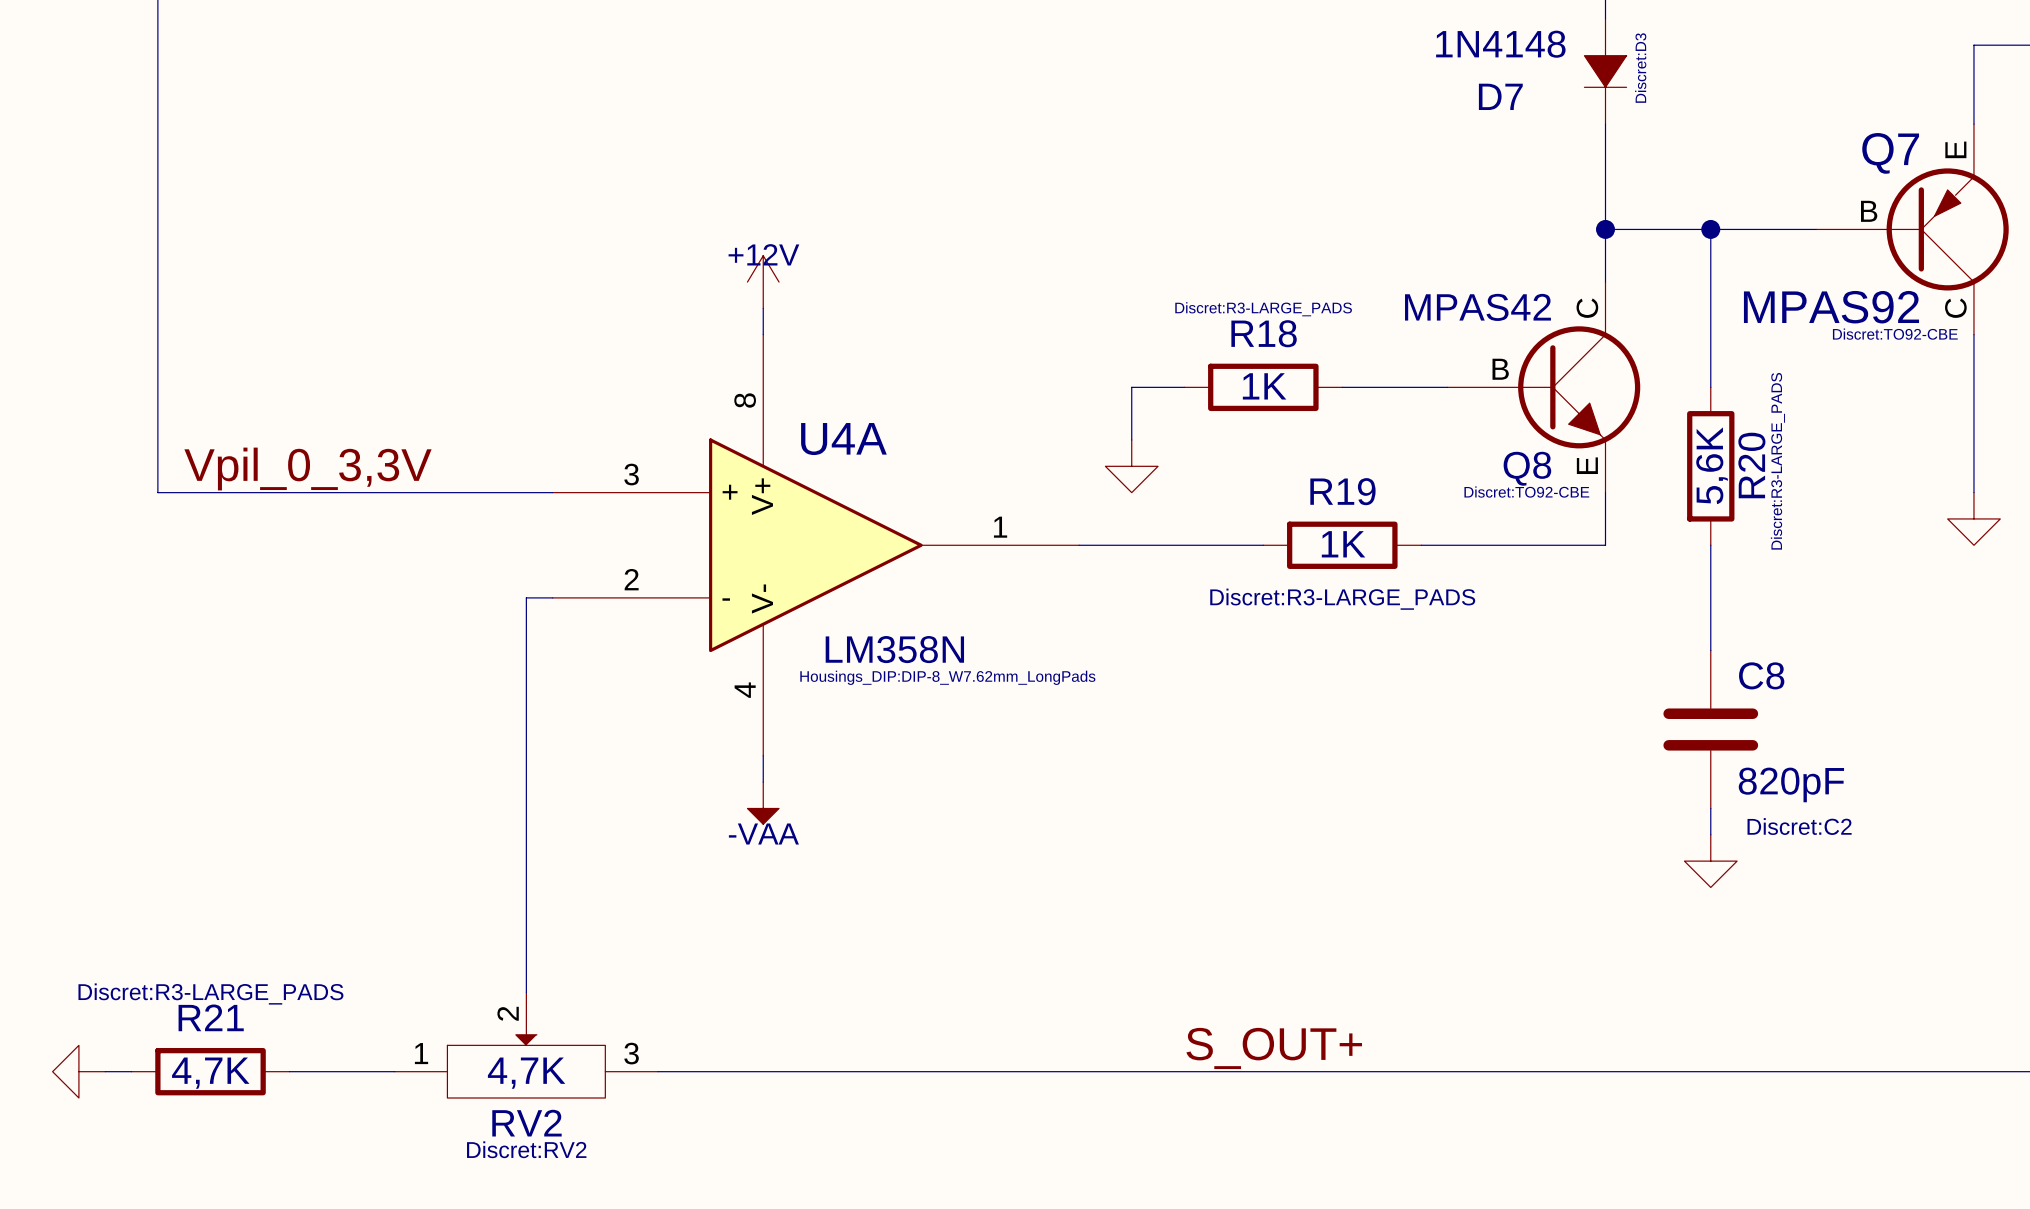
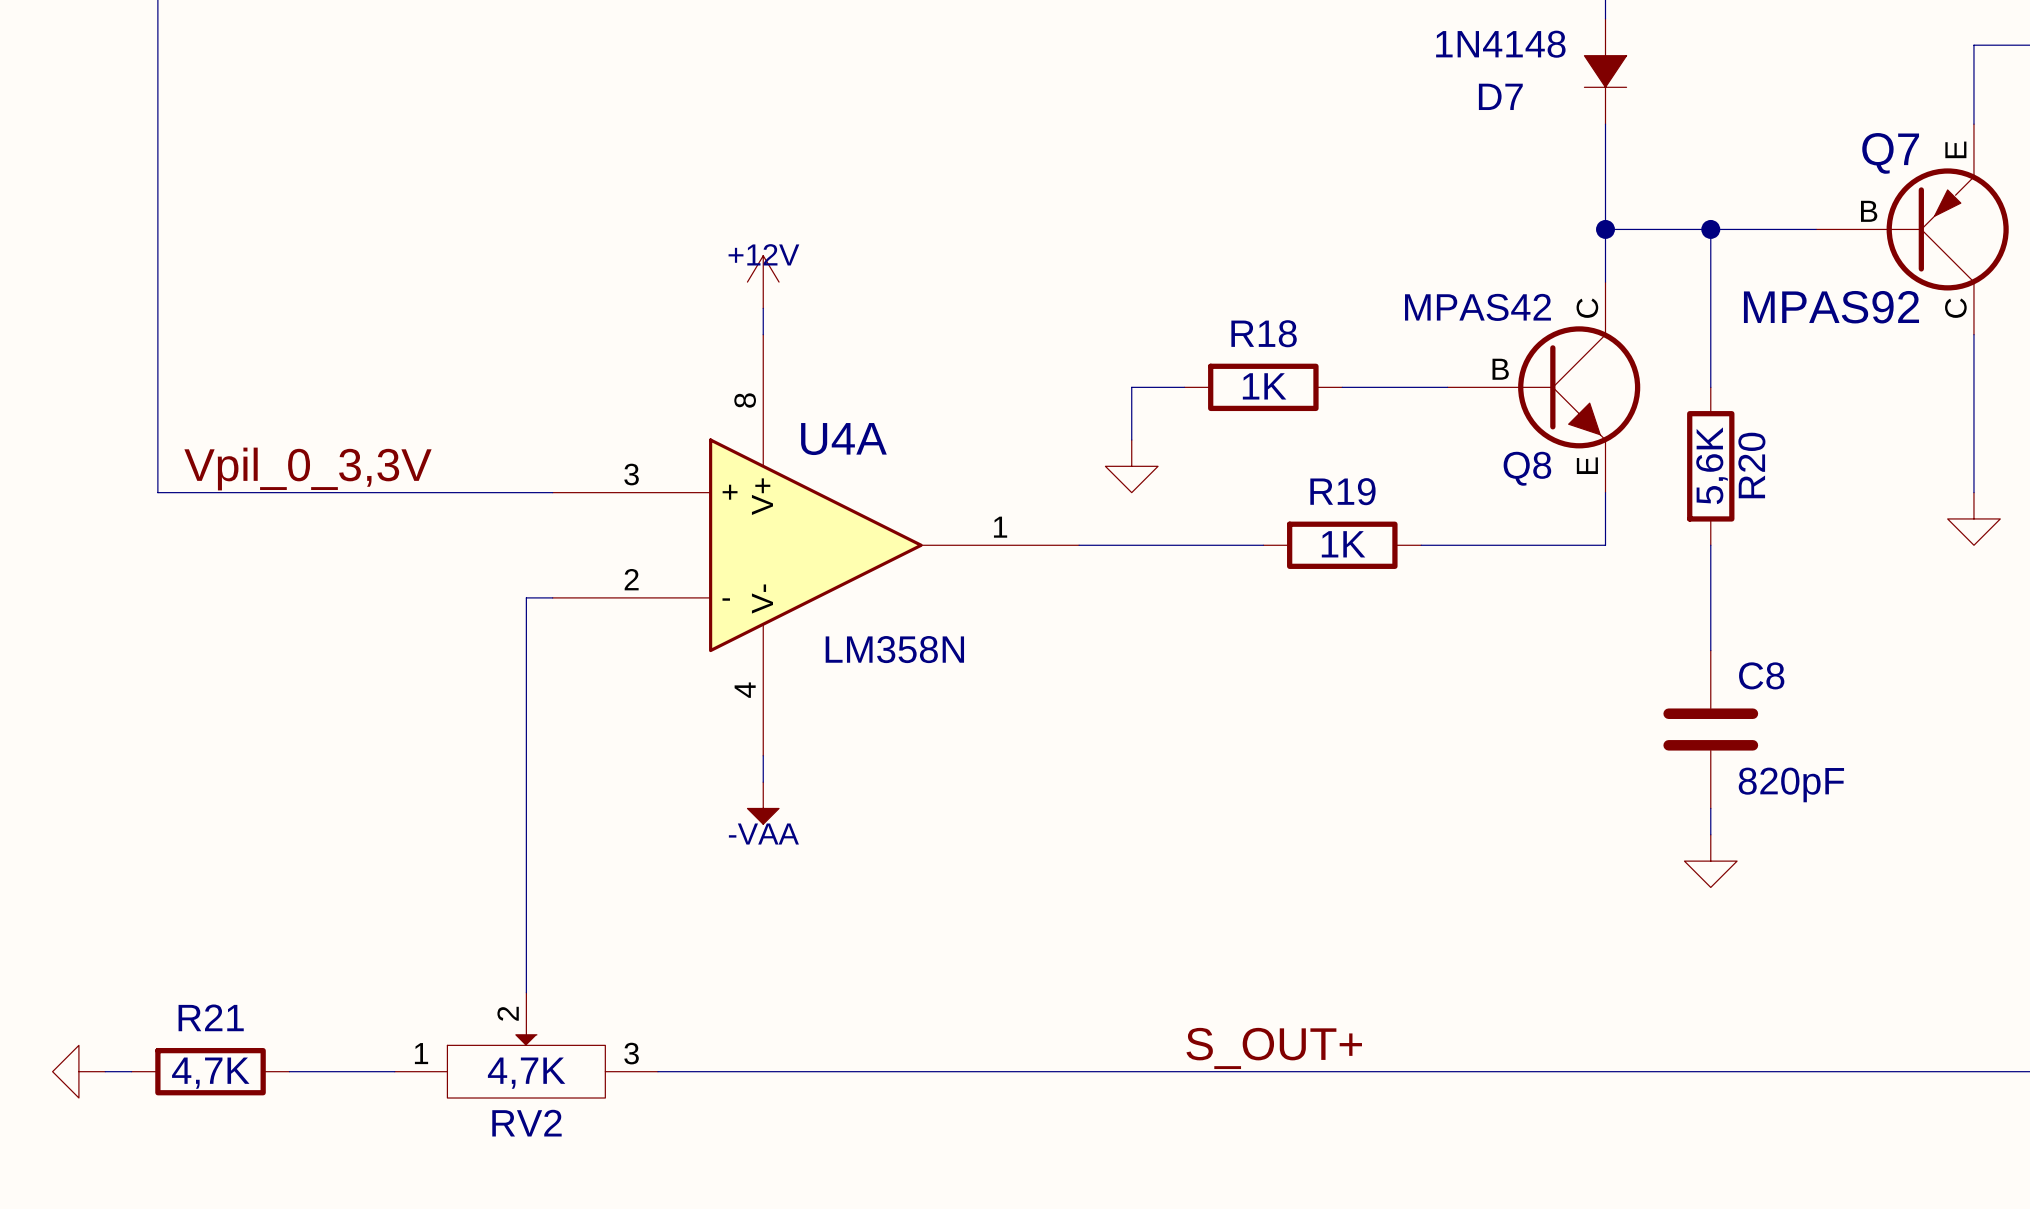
D7 text: Discret:D3 (1640, 68) -> none
R18 text: Discret:R3-LARGE_PADS (1263, 309) -> none
Q7 text: Discret:TO92-CBE (1895, 334) -> none
R20 text: Discret:R3-LARGE_PADS (1777, 461) -> none
Q8 text: Discret:TO92-CBE (1526, 492) -> none
R19 text: Discret:R3-LARGE_PADS (1342, 599) -> none
U4A text: Housings_DIP:DIP-8_W7.62mm_LongPads (947, 677) -> none
C8 text: Discret:C2 (1799, 826) -> none
R21 text: Discret:R3-LARGE_PADS (210, 993) -> none
RV2 text: Discret:RV2 (526, 1149) -> none

